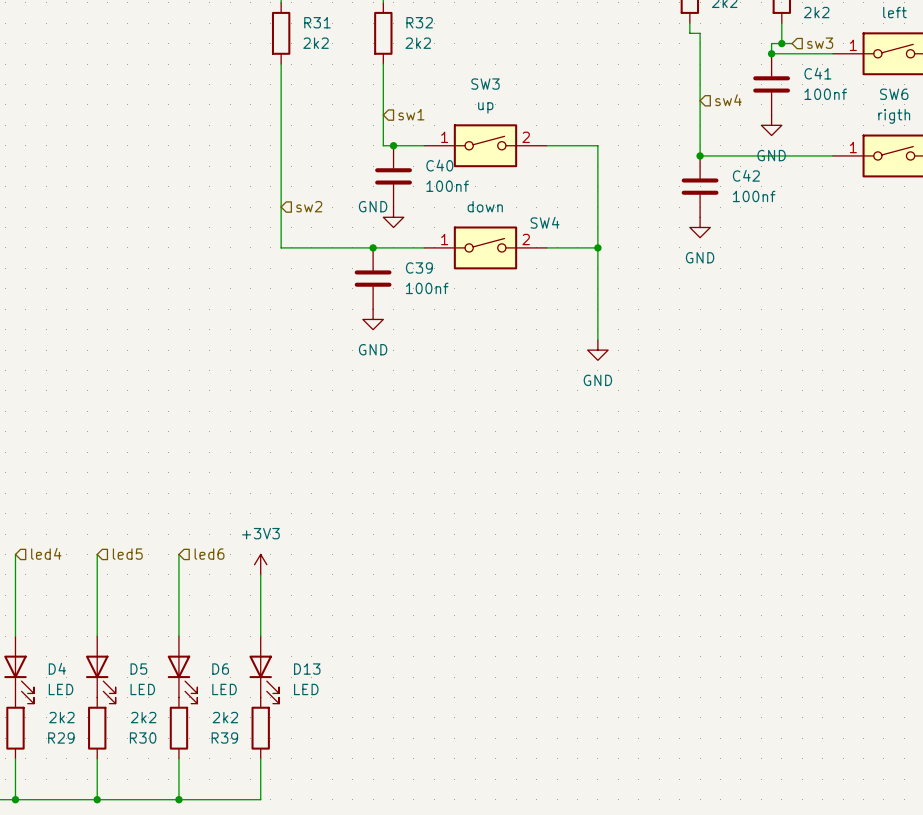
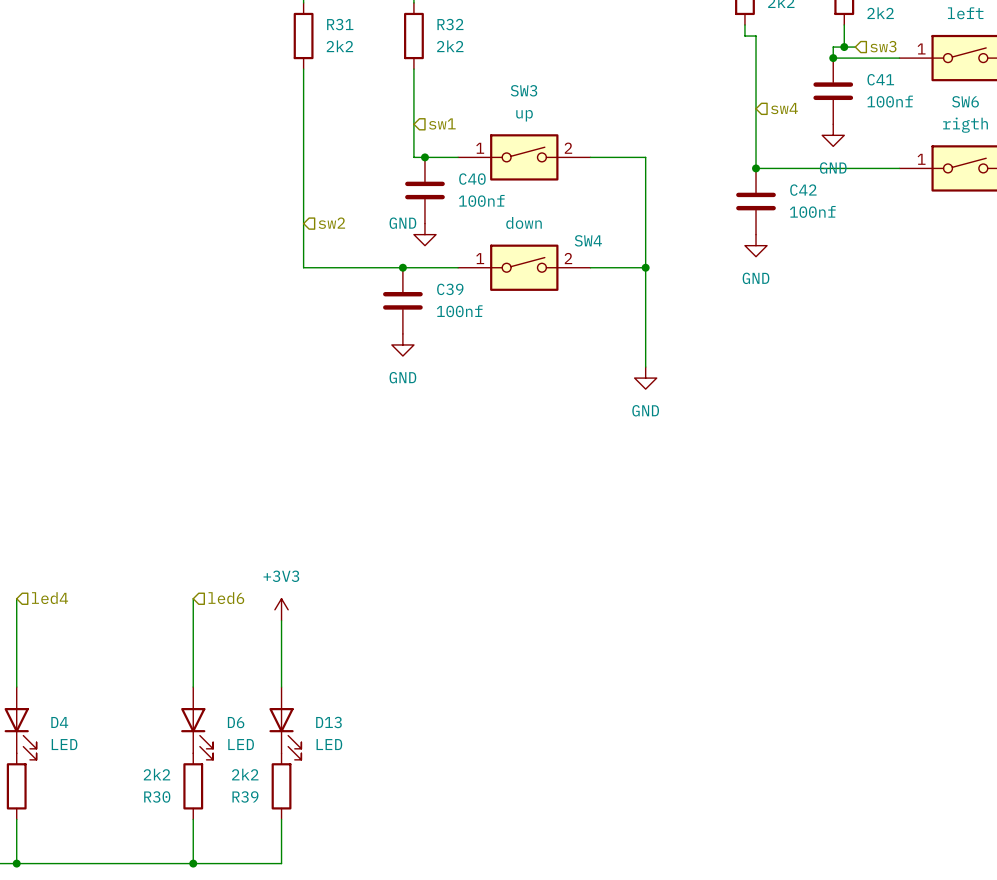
wire: (97, 554) (97, 636) -> none
hierarchical label: led5 (127, 554) -> none
D5: LED (100, 669) -> none
R29: 2k2 (97, 728) -> none
wire: (97, 758) (97, 799) -> none
junction: (97, 799) -> none

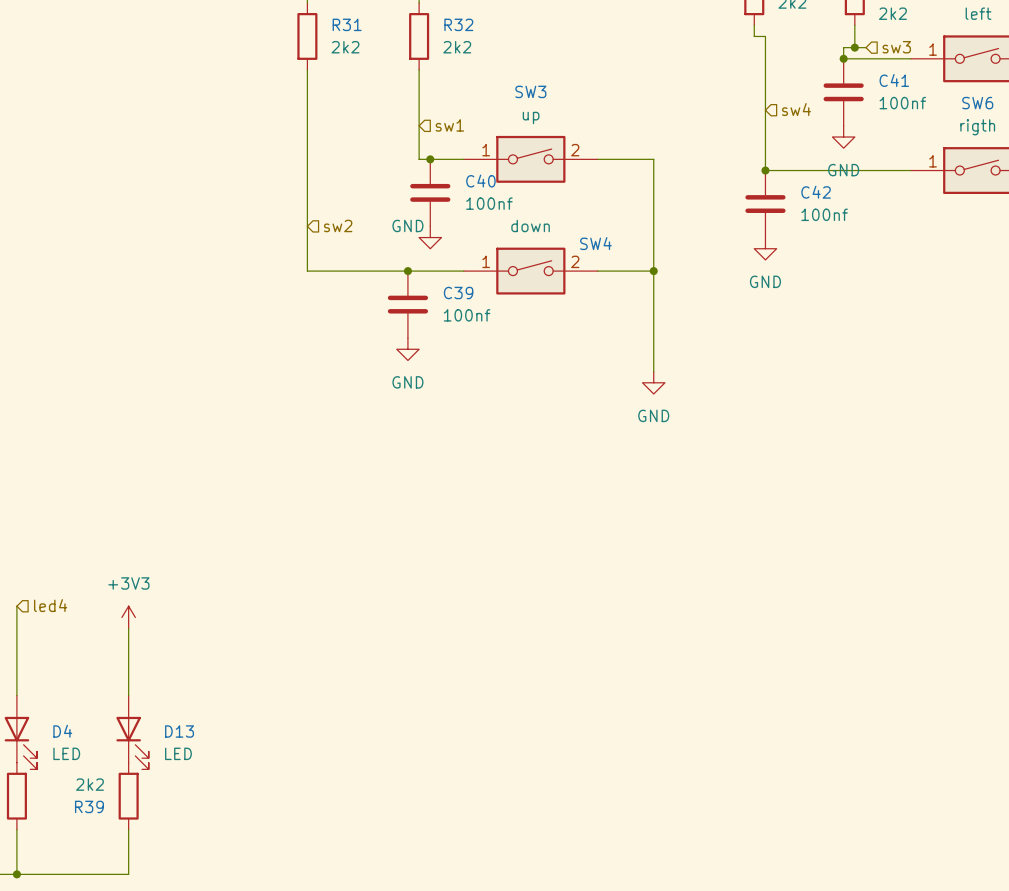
wire: (193, 598) (193, 687) -> none
hierarchical label: led6 (226, 598) -> none
power symbol position: +3V3 (281, 609) -> +3V3 (128, 617)
wire: (281, 620) (281, 687) -> (128, 628) (128, 695)
D6: LED (197, 723) -> none
D13 position: (285, 723) -> (132, 732)
R30: 2k2 (193, 786) -> none
R39 position: (281, 786) -> (128, 796)
wire: (193, 819) (193, 863) -> none
wire: (281, 819) (281, 863) (127, 863) -> (128, 829) (128, 874)
junction: (193, 863) -> none

